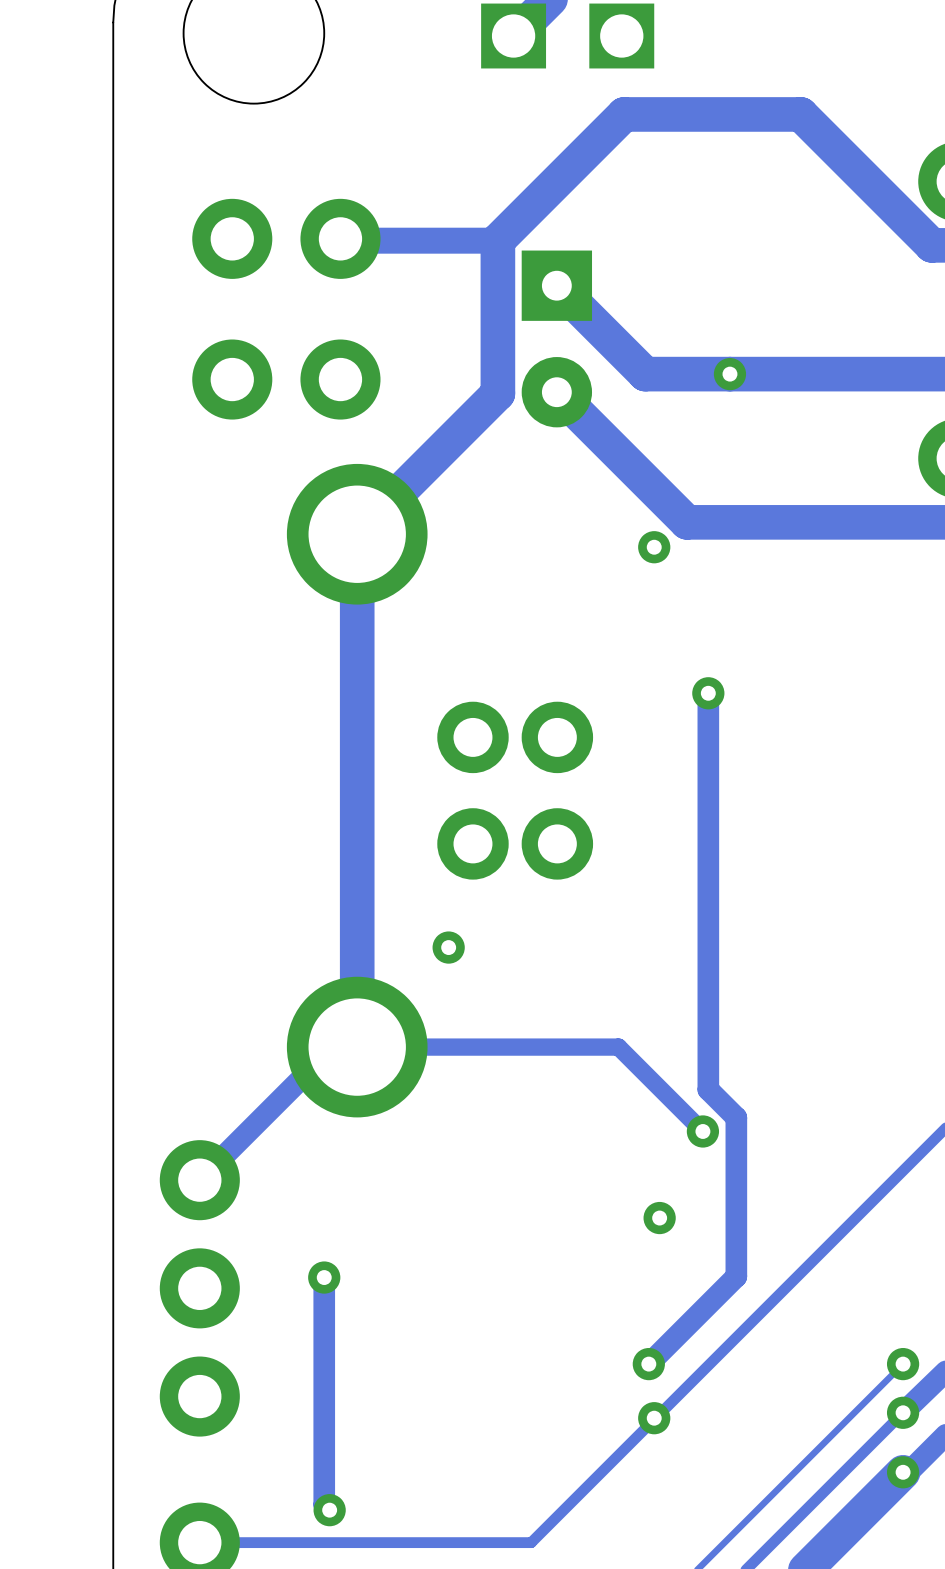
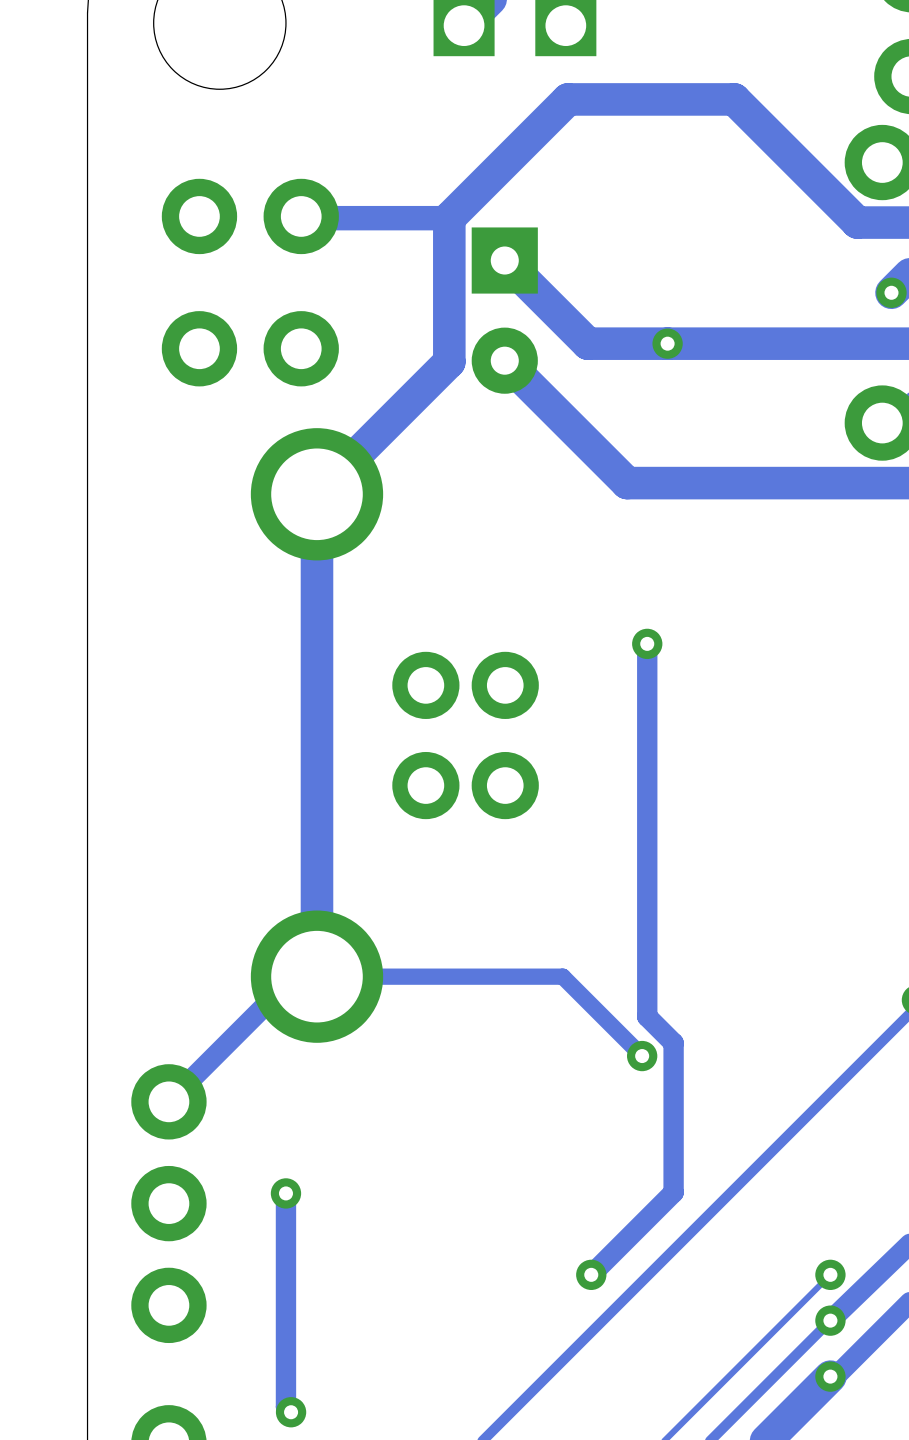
via: (654, 547) -> none
via: (448, 947) -> none
via: (659, 1218) -> none
via: (654, 1418) -> none

